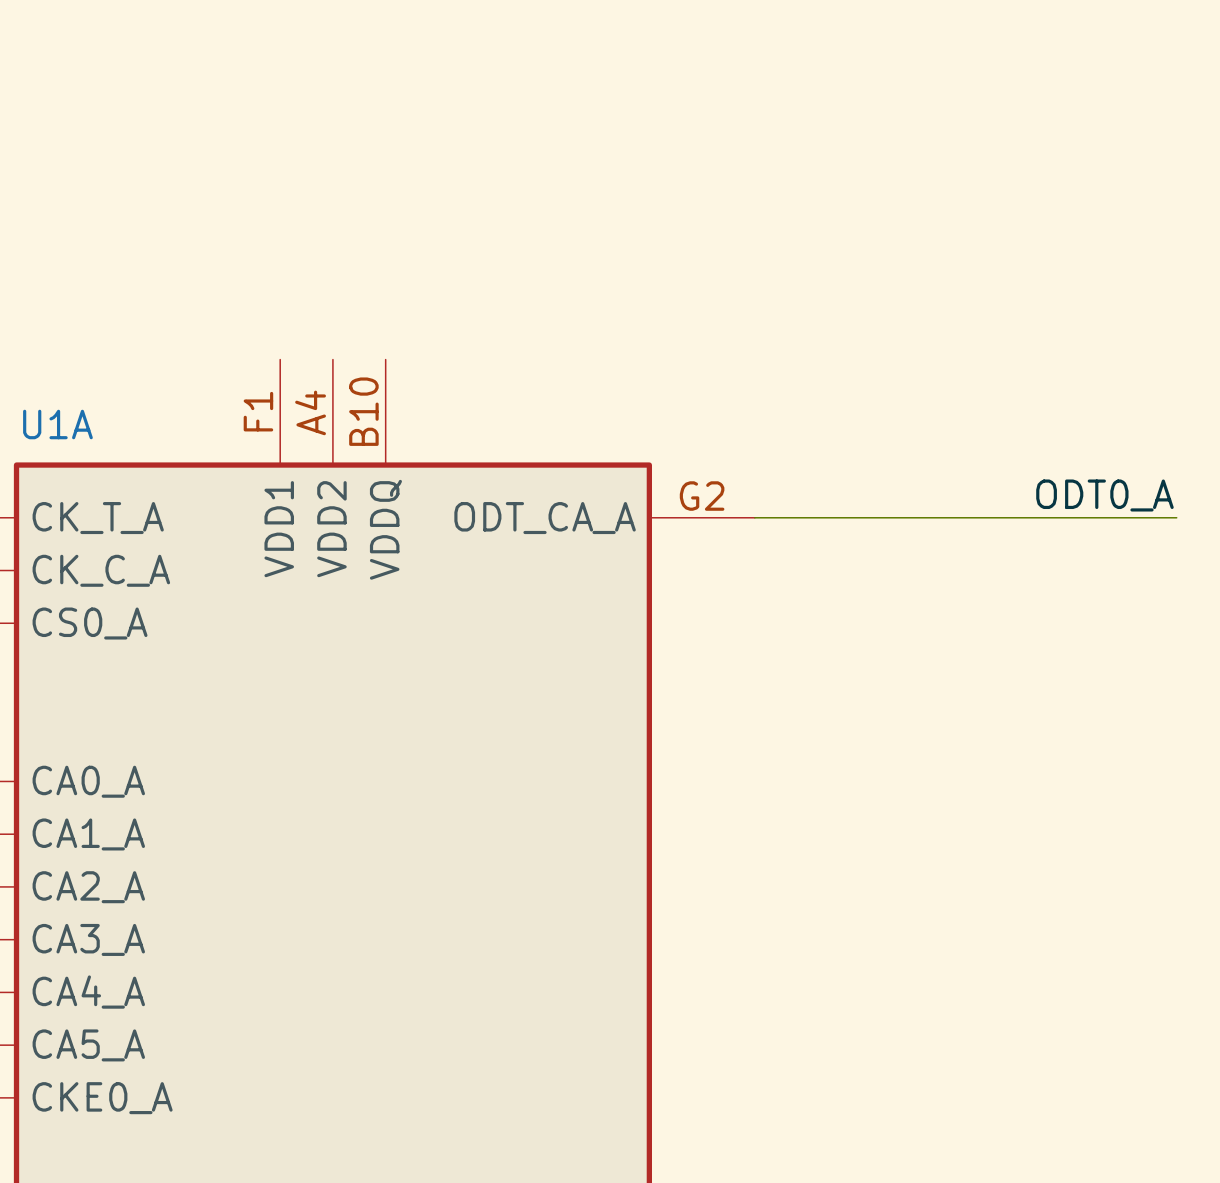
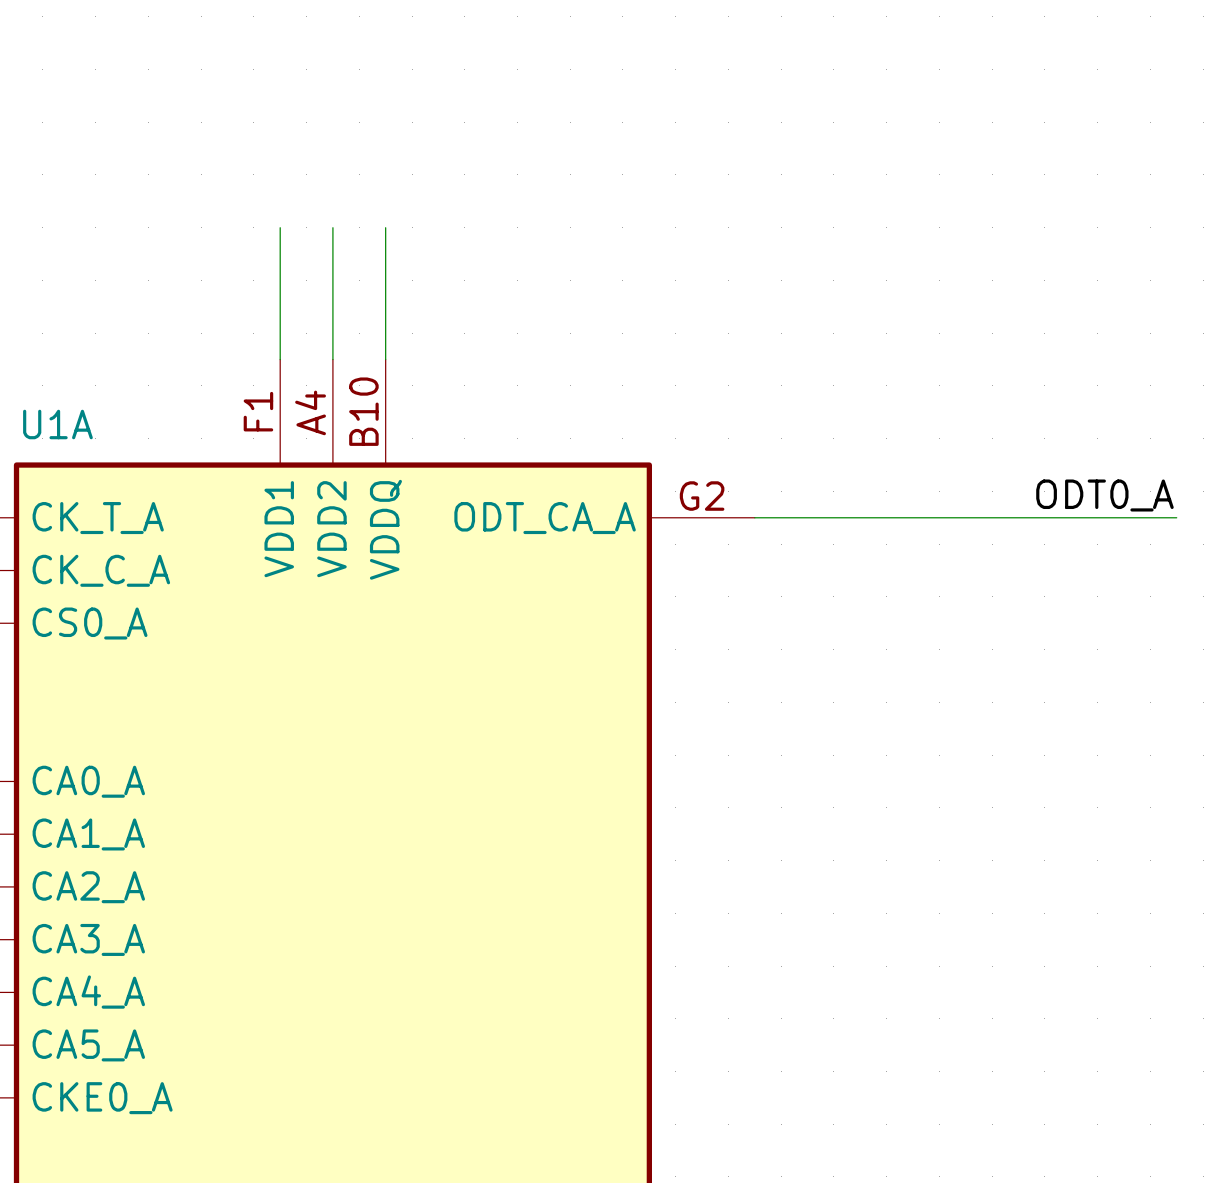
wire: none -> (280, 227) (280, 359)
wire: none -> (332, 227) (332, 359)
wire: none -> (385, 227) (385, 359)

